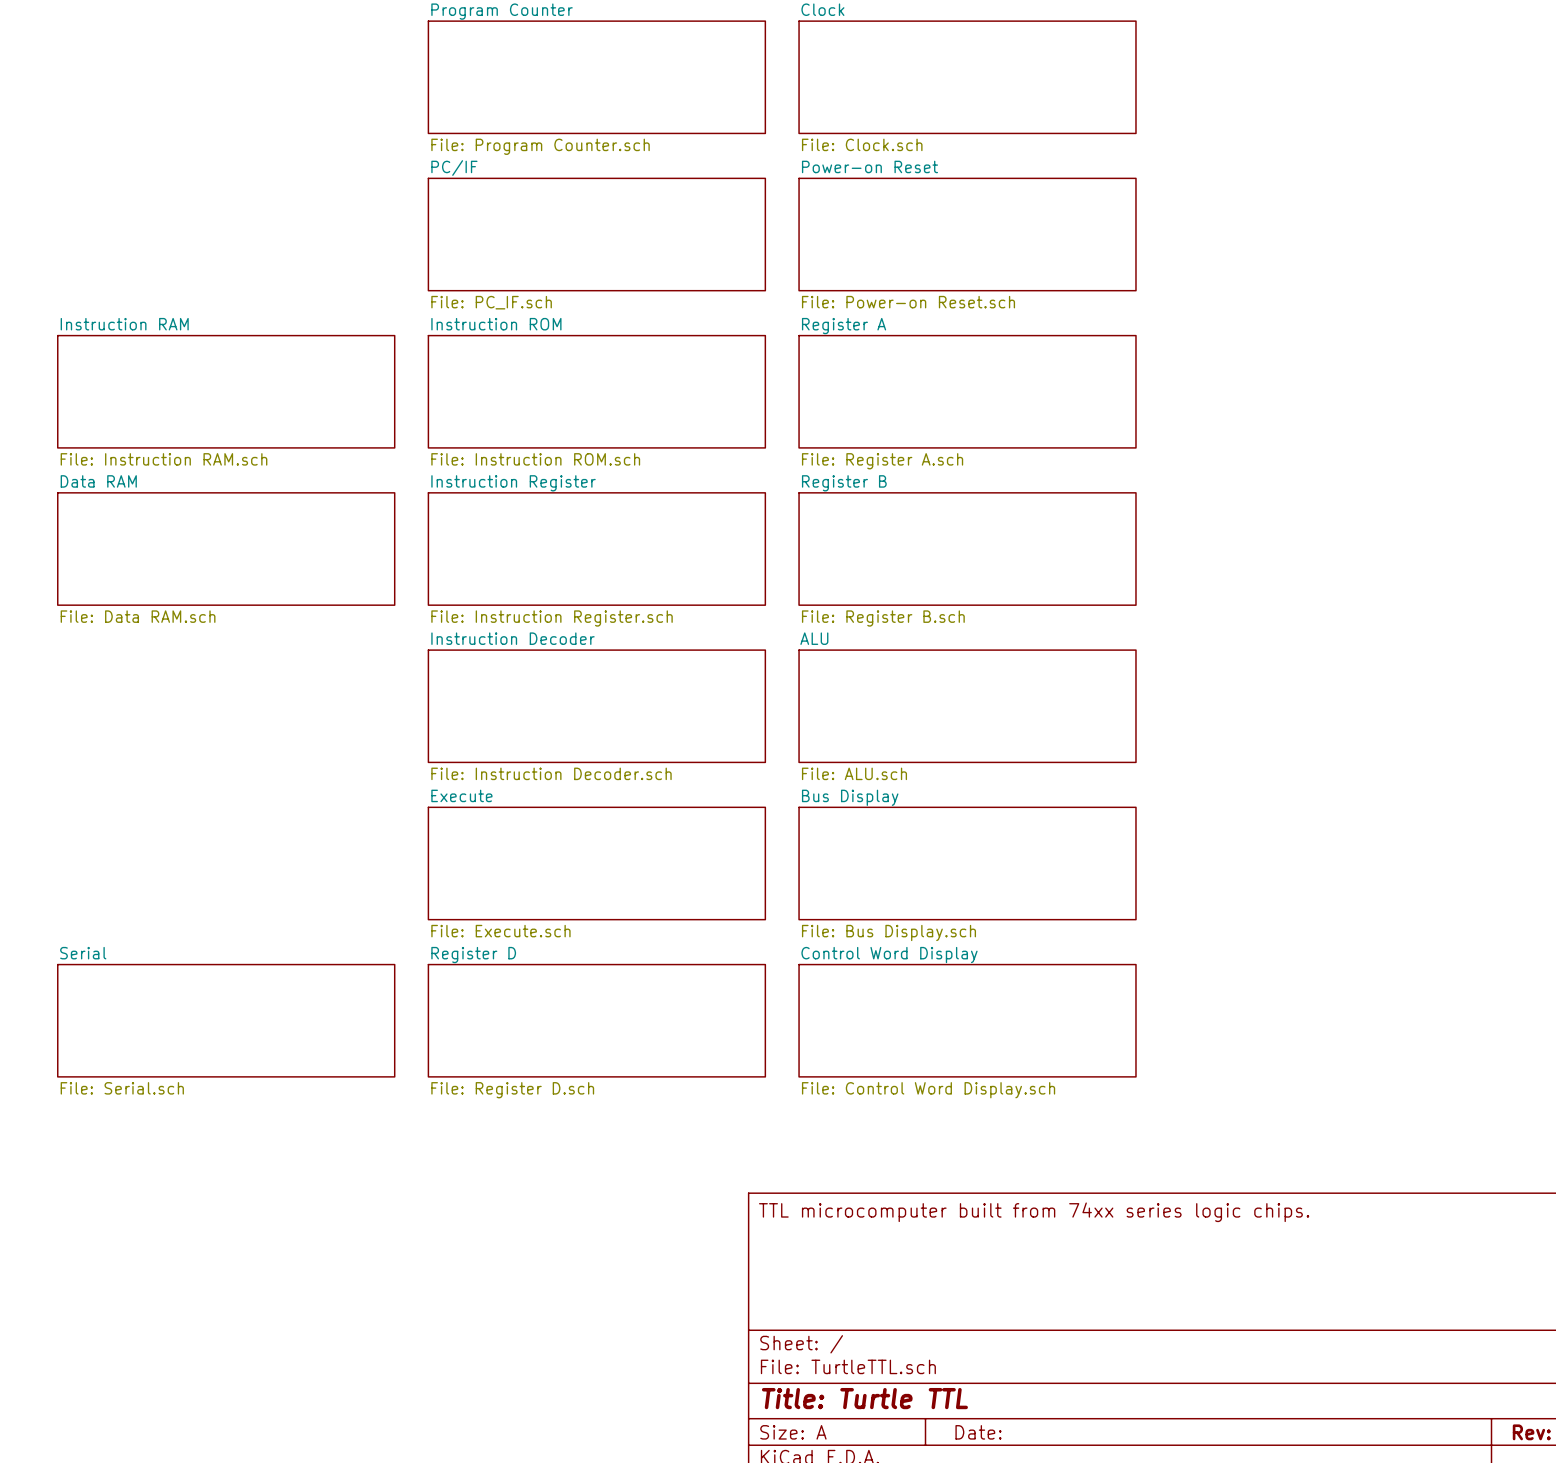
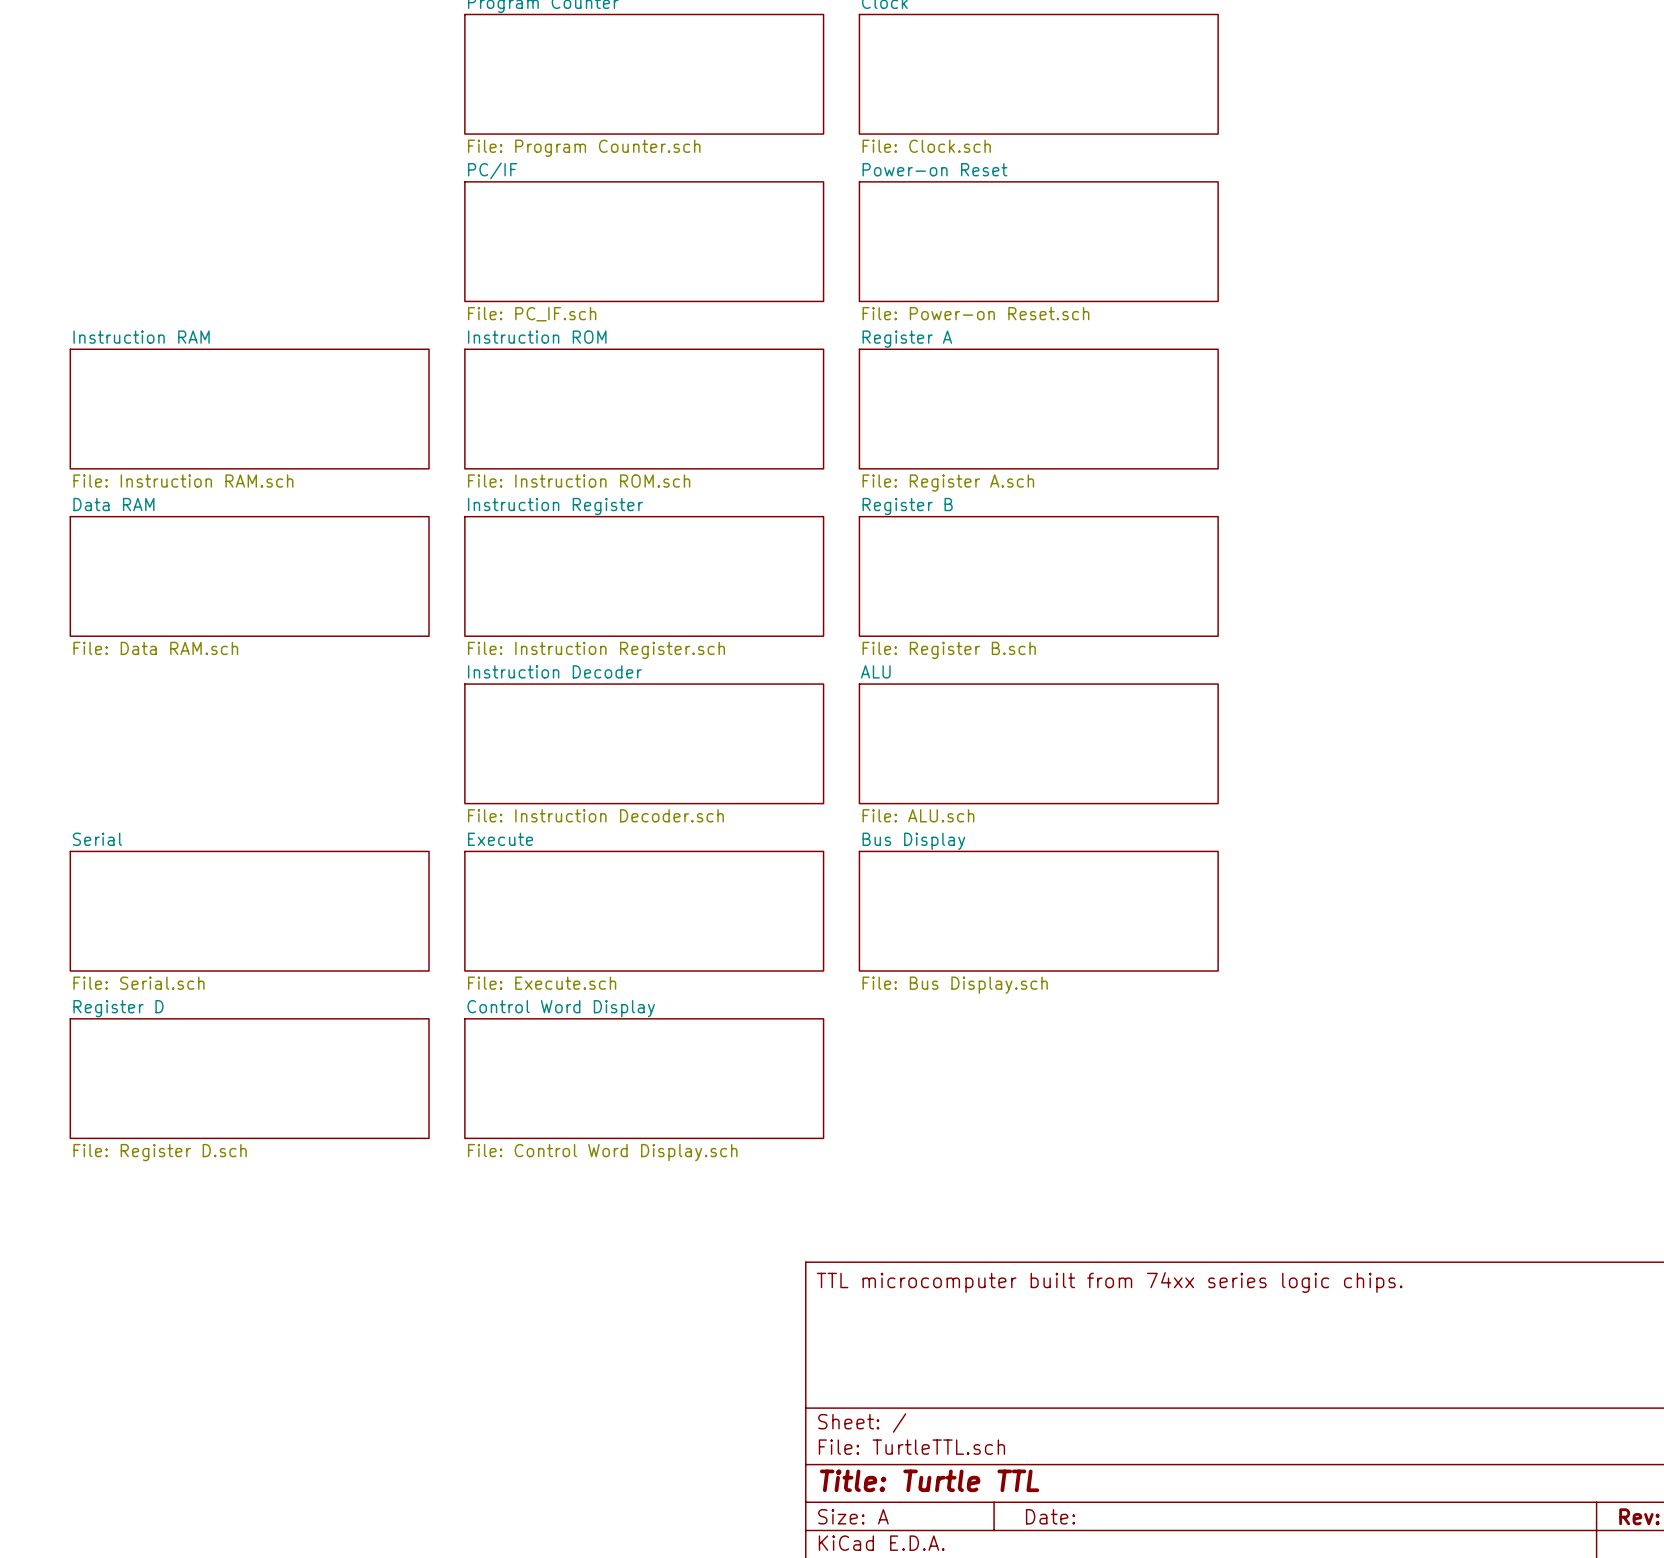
sheet Serial: none -> File: Serial.sch (249, 911)
sheet Serial name: Serial (83, 953) -> Register D (118, 1008)
sheet Register D name: Register D (473, 955) -> Control Word Display (561, 1008)
sheet Control Word Display: File: Control Word Display.sch (967, 1020) -> none
sheet Serial value: File: Serial.sch (122, 1088) -> File: Register D.sch (160, 1152)
sheet Register D value: File: Register D.sch (512, 1090) -> File: Control Word Display.sch (602, 1152)

